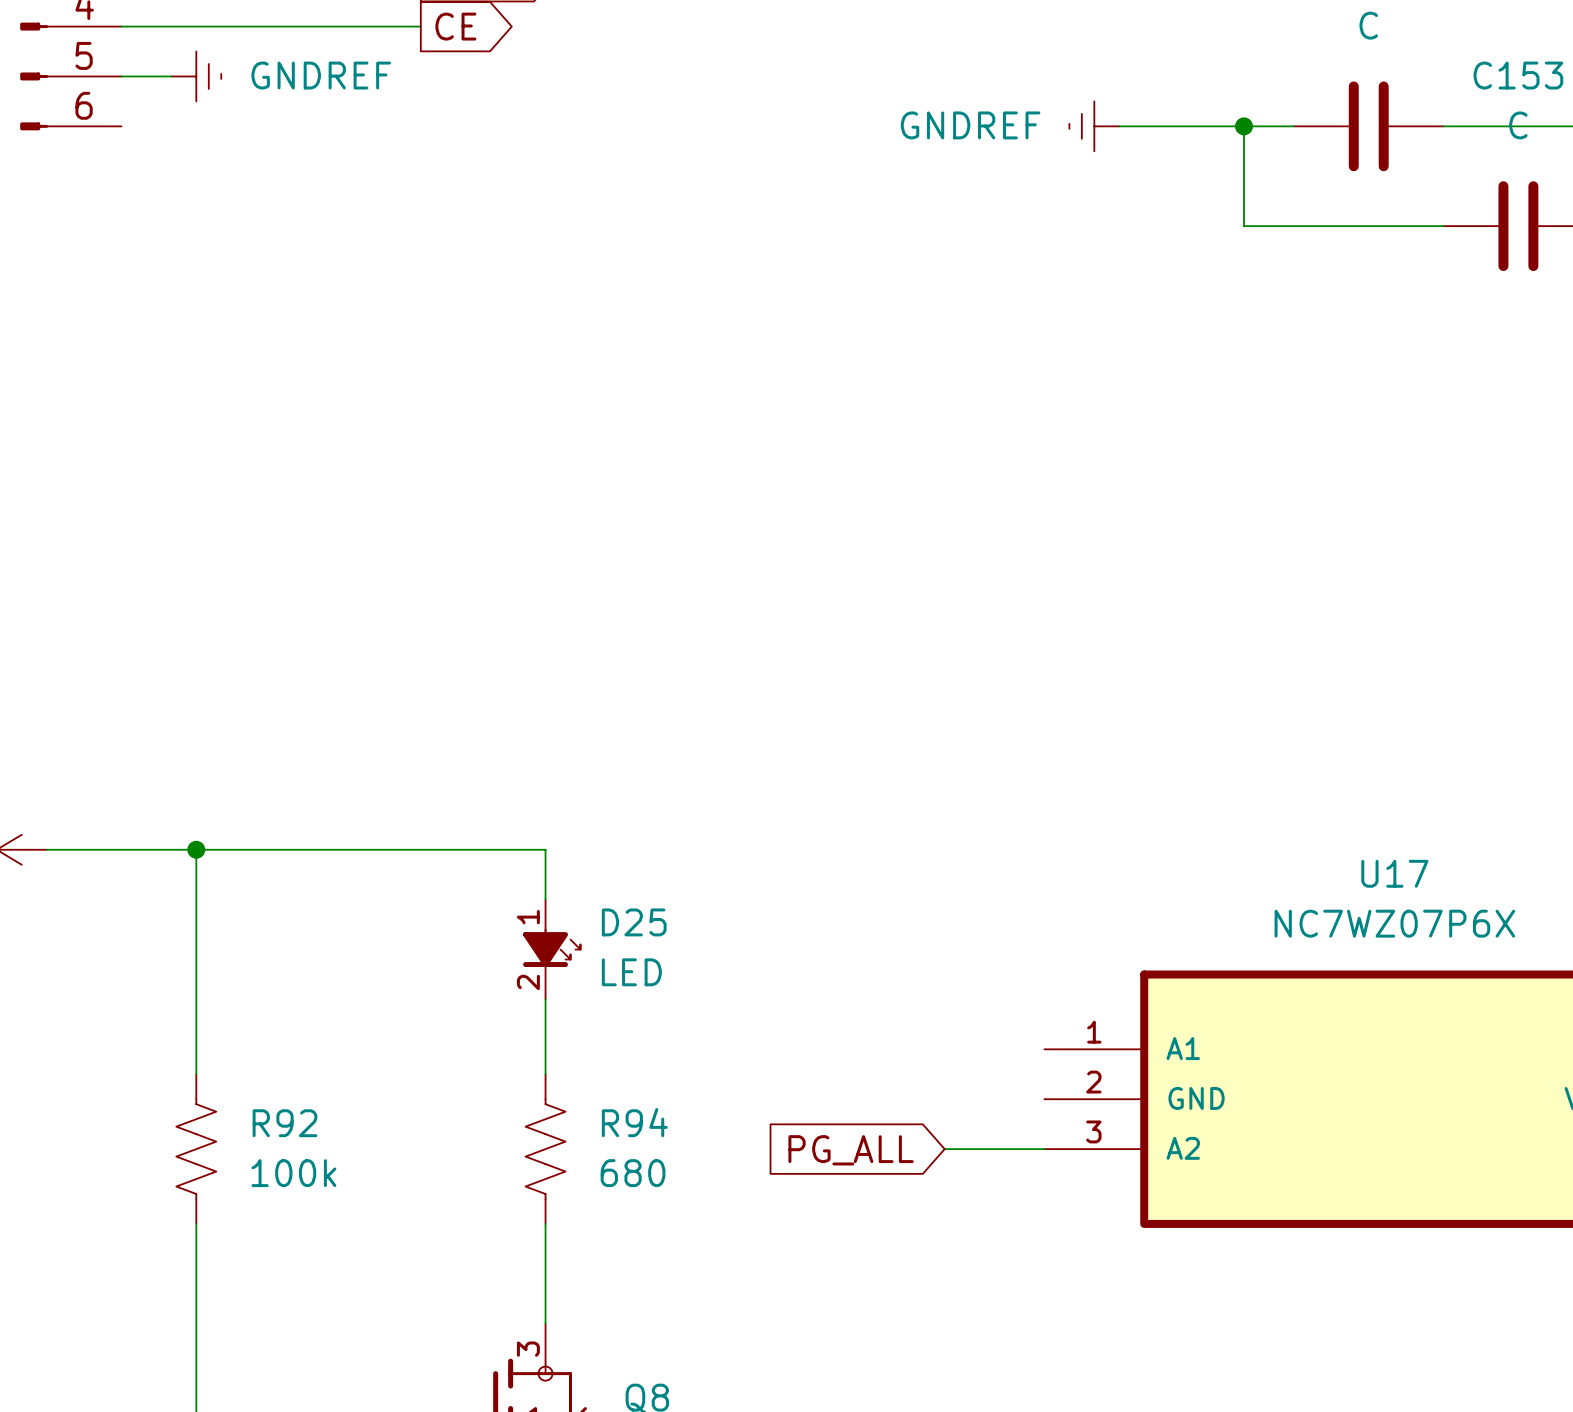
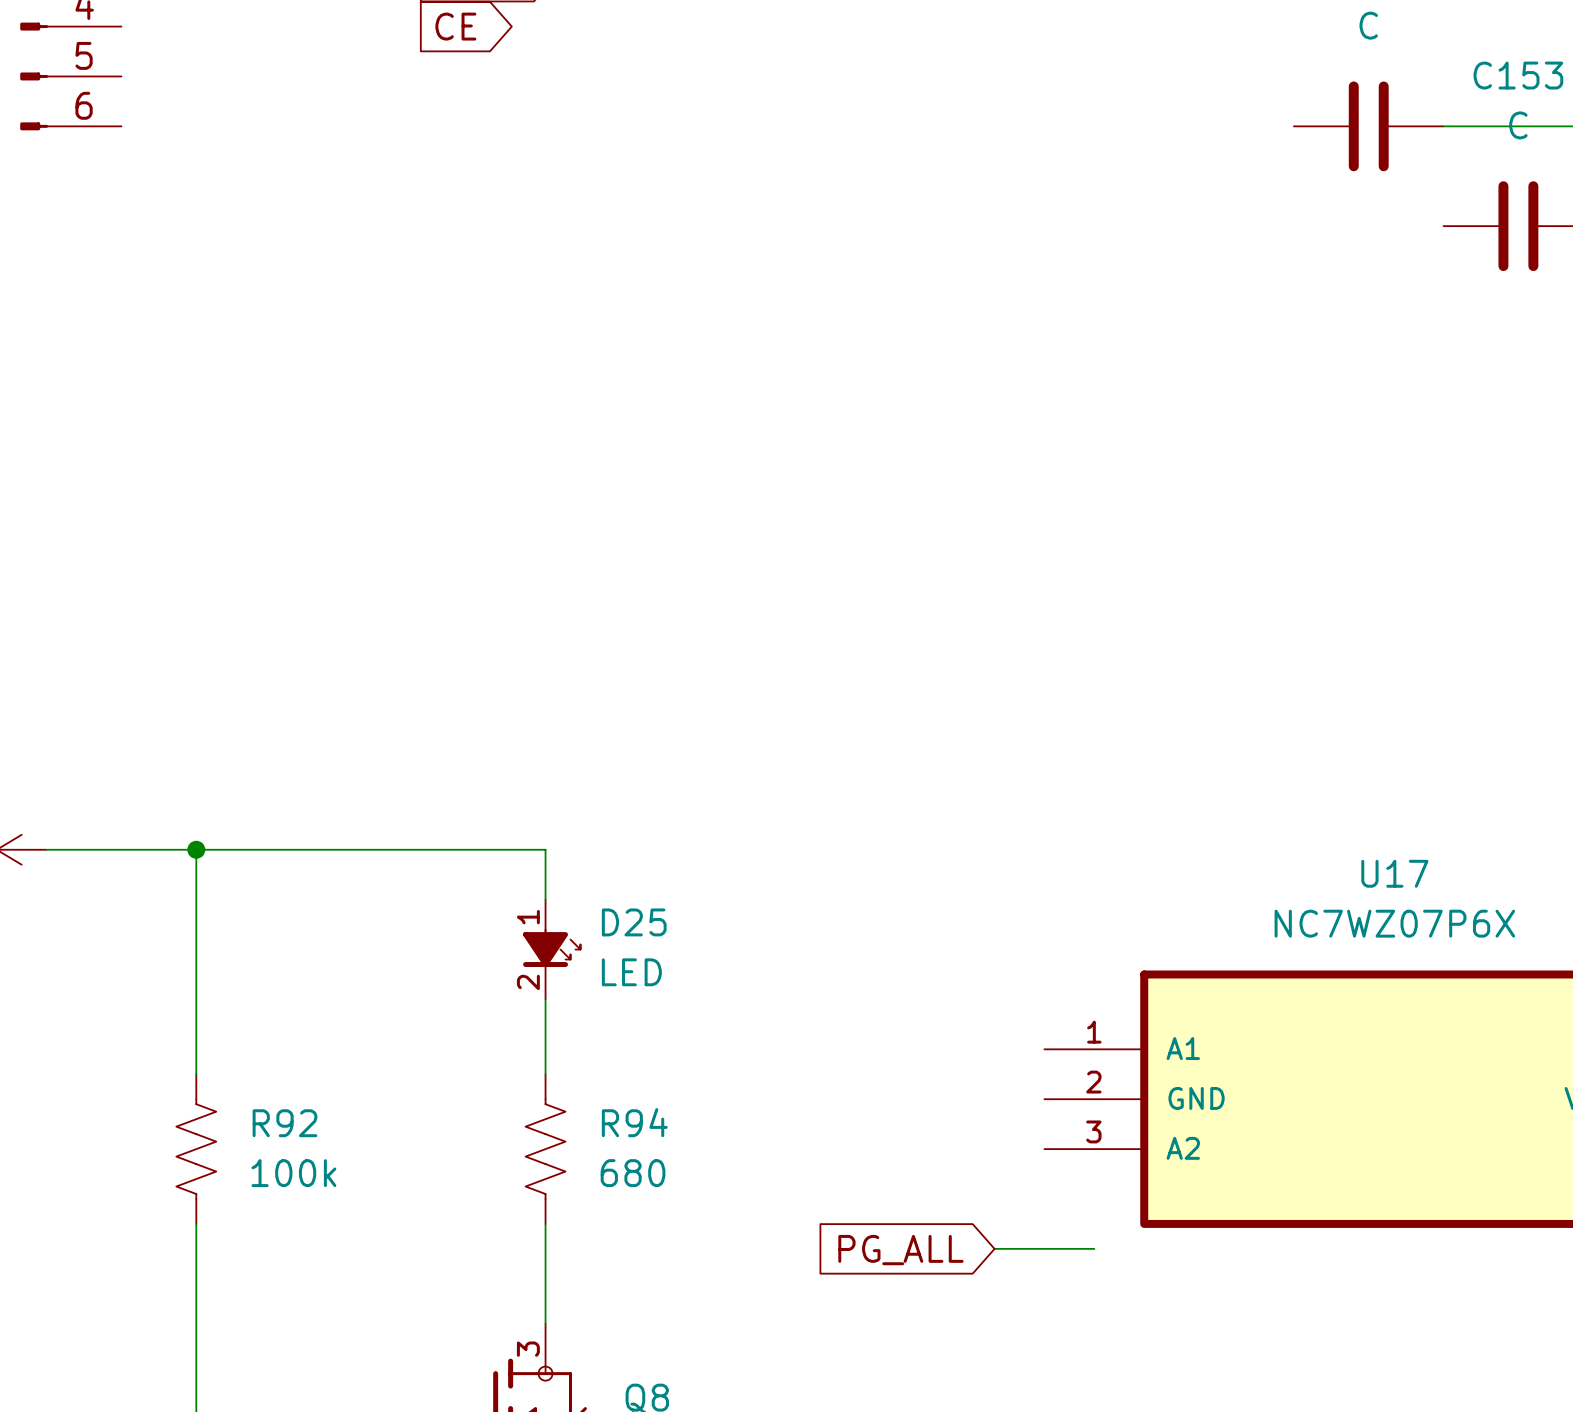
wire: (121, 26) (420, 26) -> none
wire: (121, 76) (171, 76) -> none
power symbol: GNDREF (196, 76) -> none
power symbol: GNDREF (1094, 126) -> none
wire: (1119, 126) (1293, 126) -> none
wire: (1244, 126) (1244, 226) (1443, 226) -> none
junction: (1244, 126) -> none
wire: (944, 1149) (1044, 1149) -> (994, 1248) (1094, 1248)
global label position: PG_ALL (851, 1150) -> PG_ALL (900, 1250)

